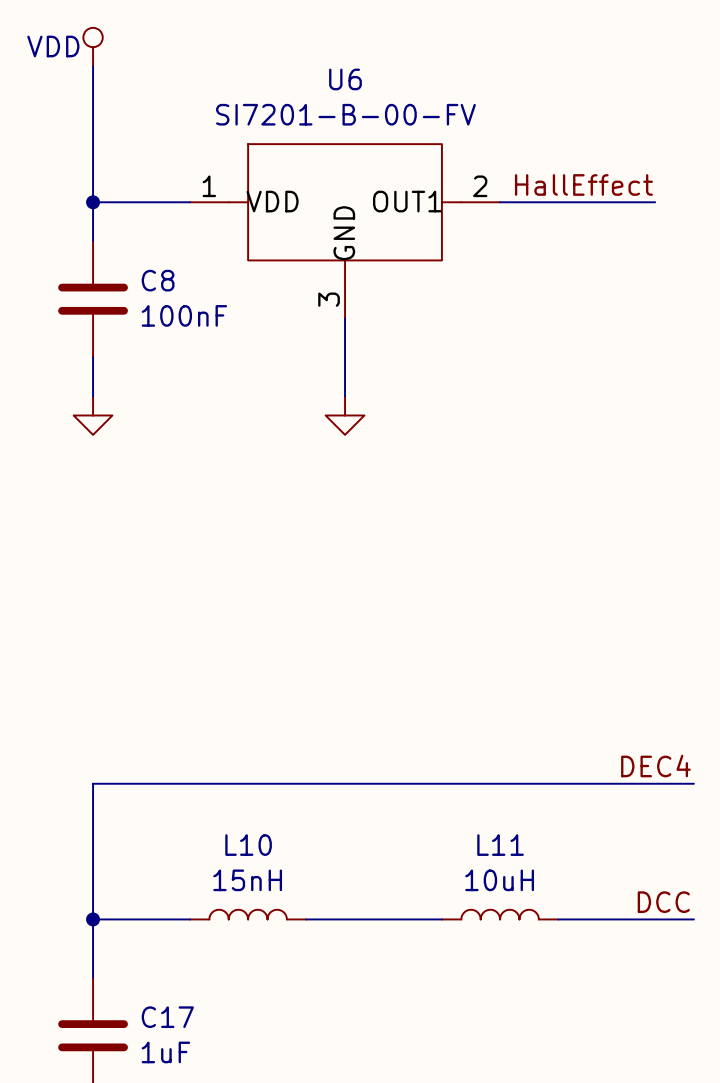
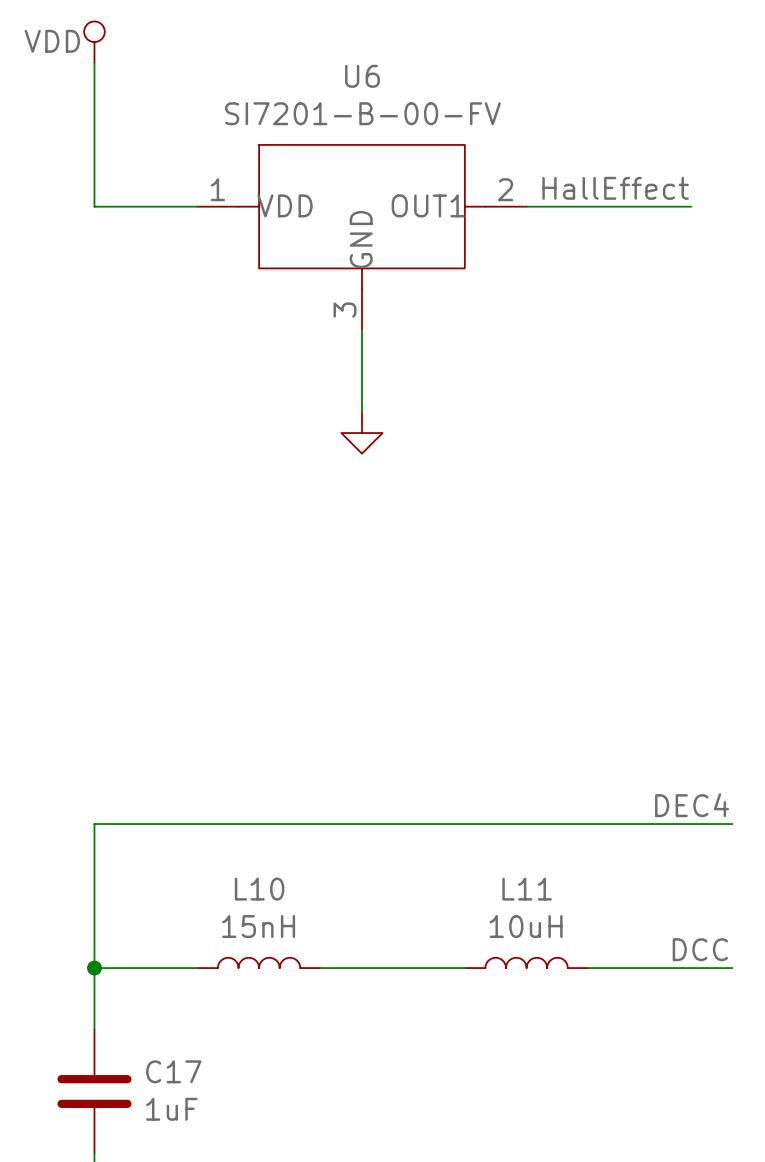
wire: (93, 202) (93, 241) -> none
junction: (93, 202) -> none
C8: 100nF (93, 299) -> none
wire: (93, 357) (93, 396) -> none
power symbol: (93, 415) -> none

